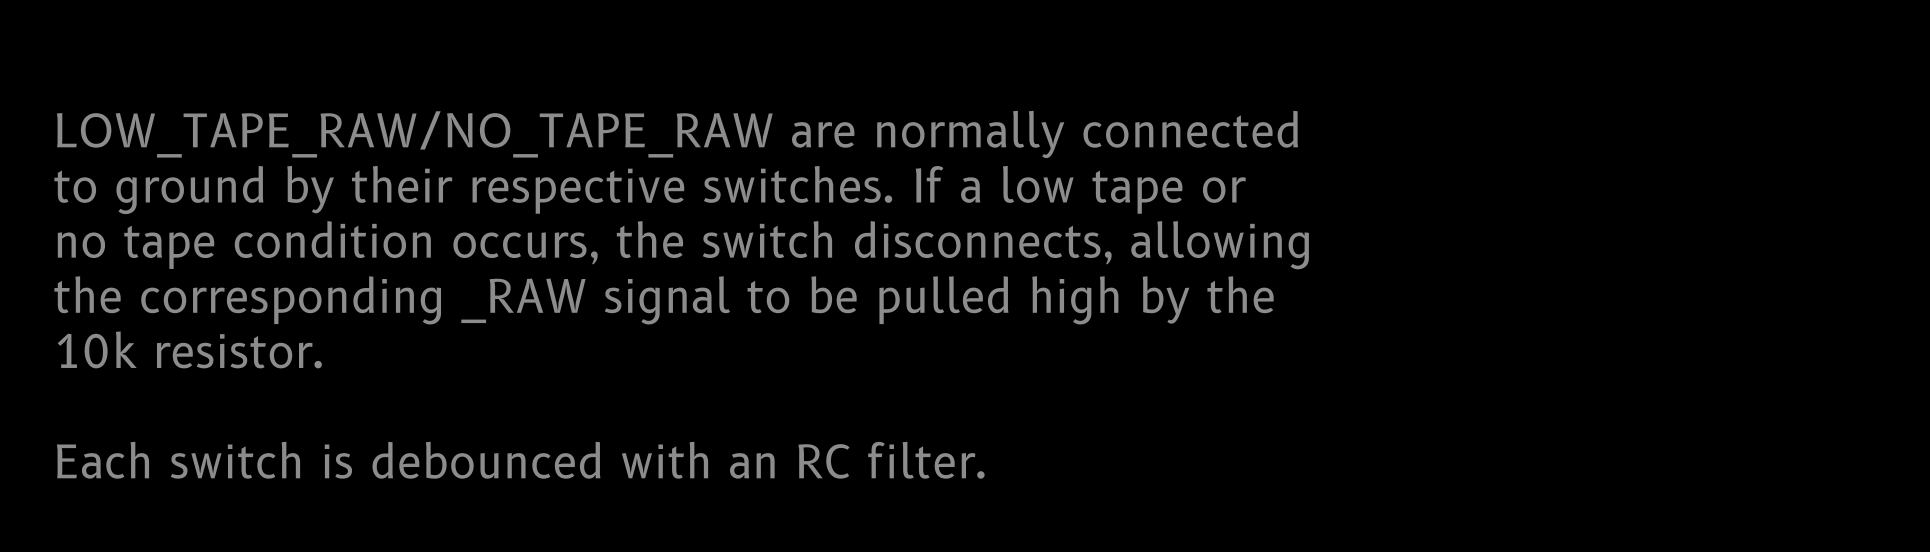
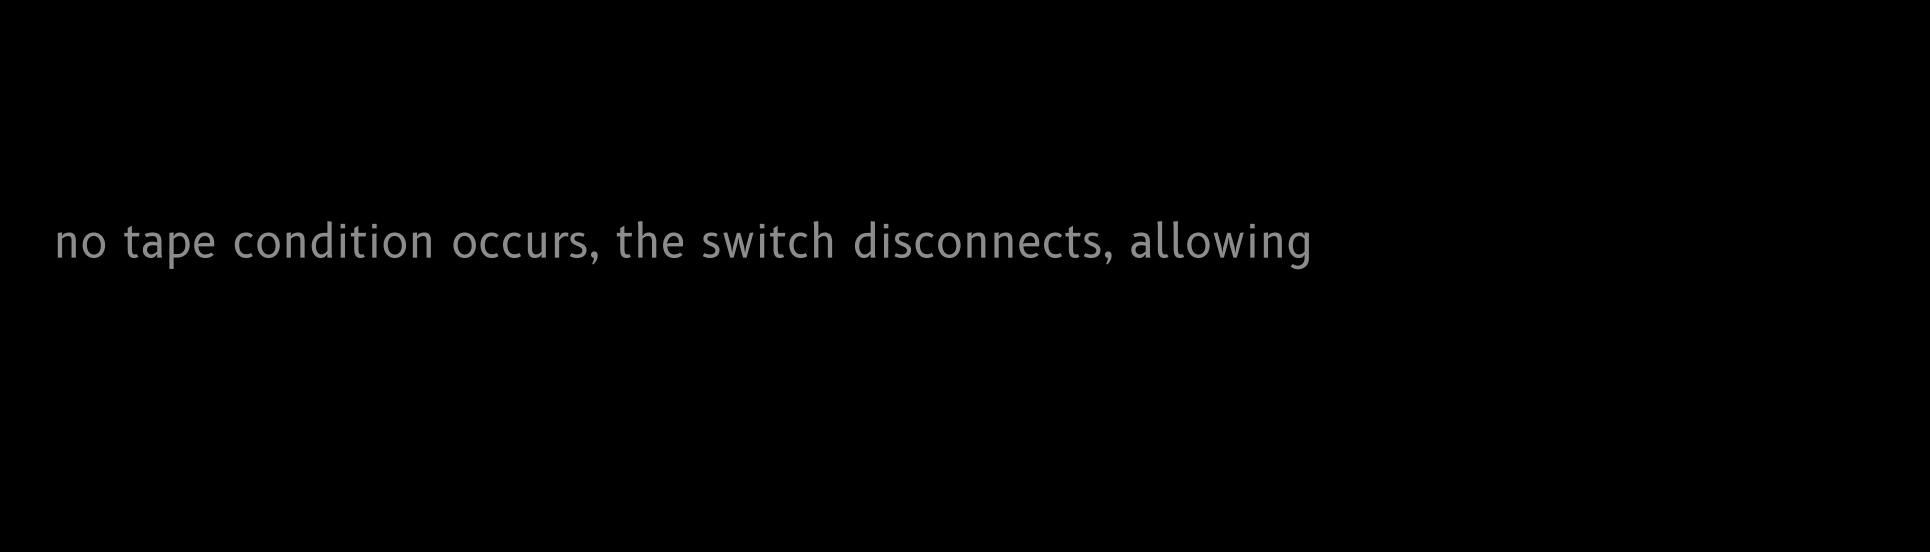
text: LOW_TAPE_RAW/NO_TAPE_RAW are normally connected (677, 134) -> none
text: to ground by their respective switches. If a low tape or (650, 190) -> none
text: the corresponding _RAW signal to be pulled high by the (664, 300) -> none
text: 10k resistor. (189, 349) -> none
text: Each switch is debounced with an RC filter. (520, 460) -> none

